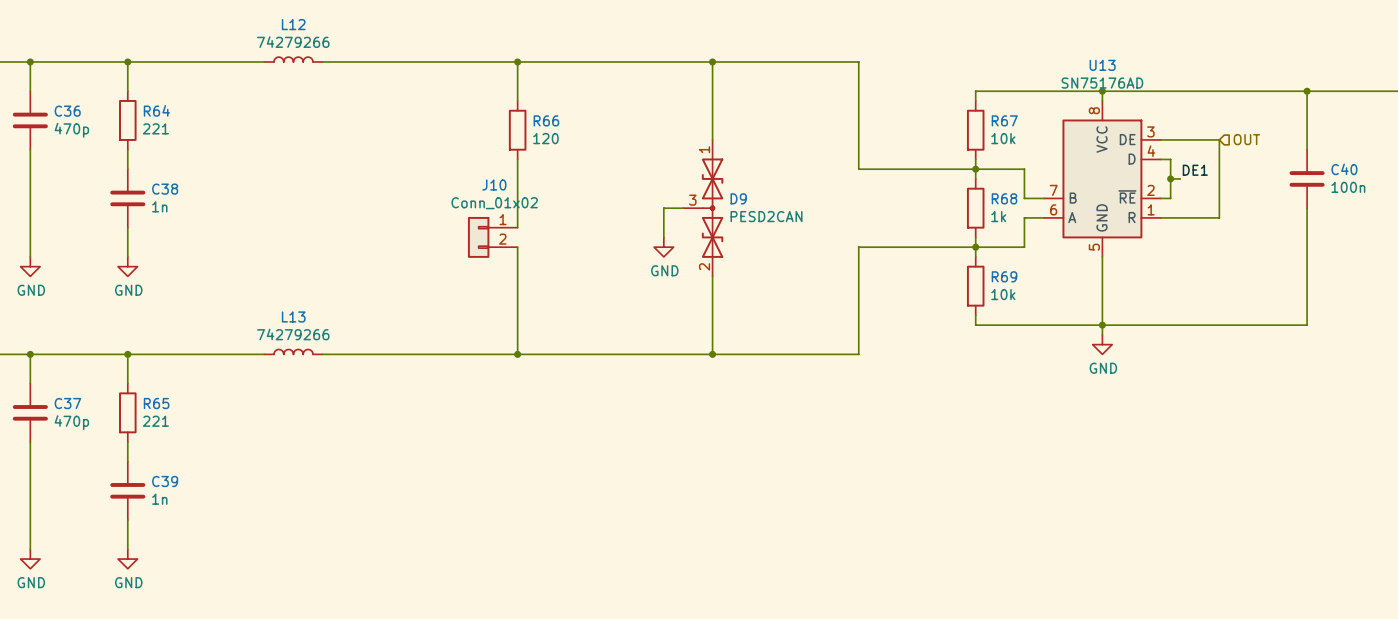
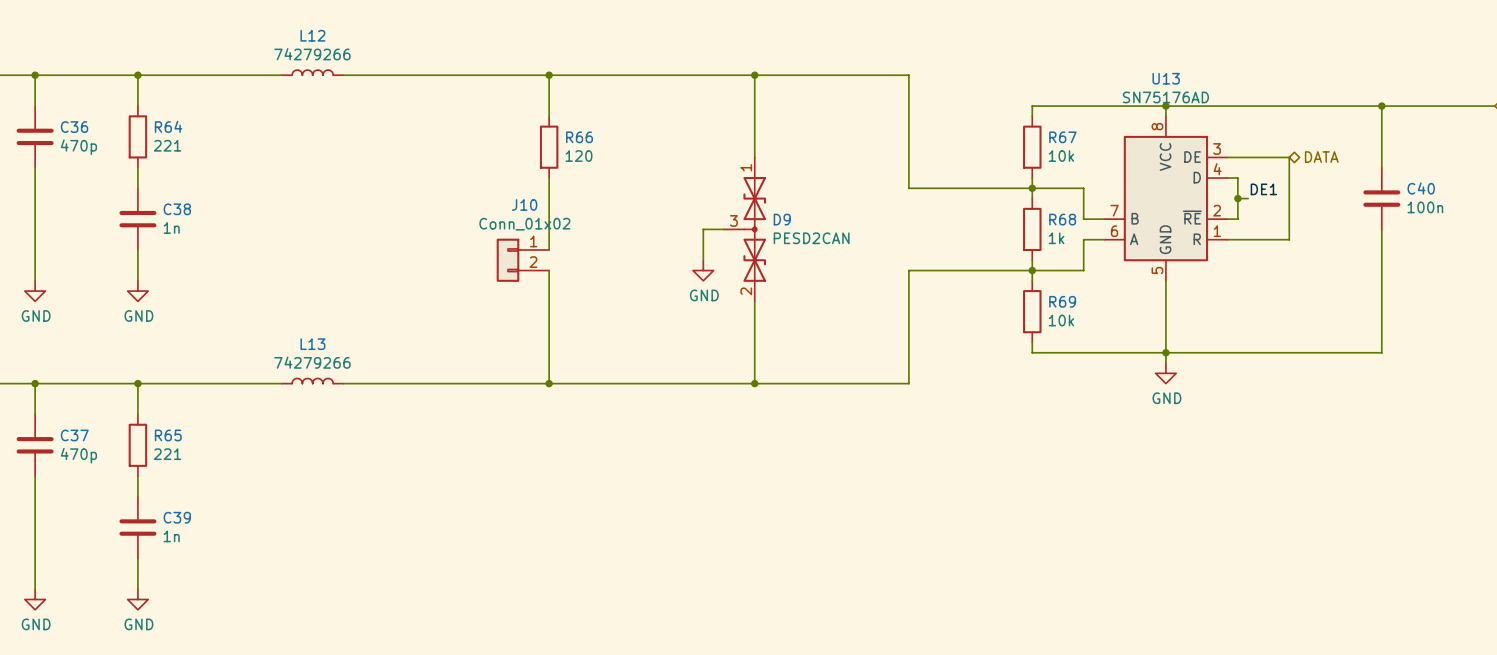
hierarchical label shape: input (1246, 139) -> bidirectional (1321, 157)
hierarchical label: OUT (1246, 139) -> DATA (1321, 157)

